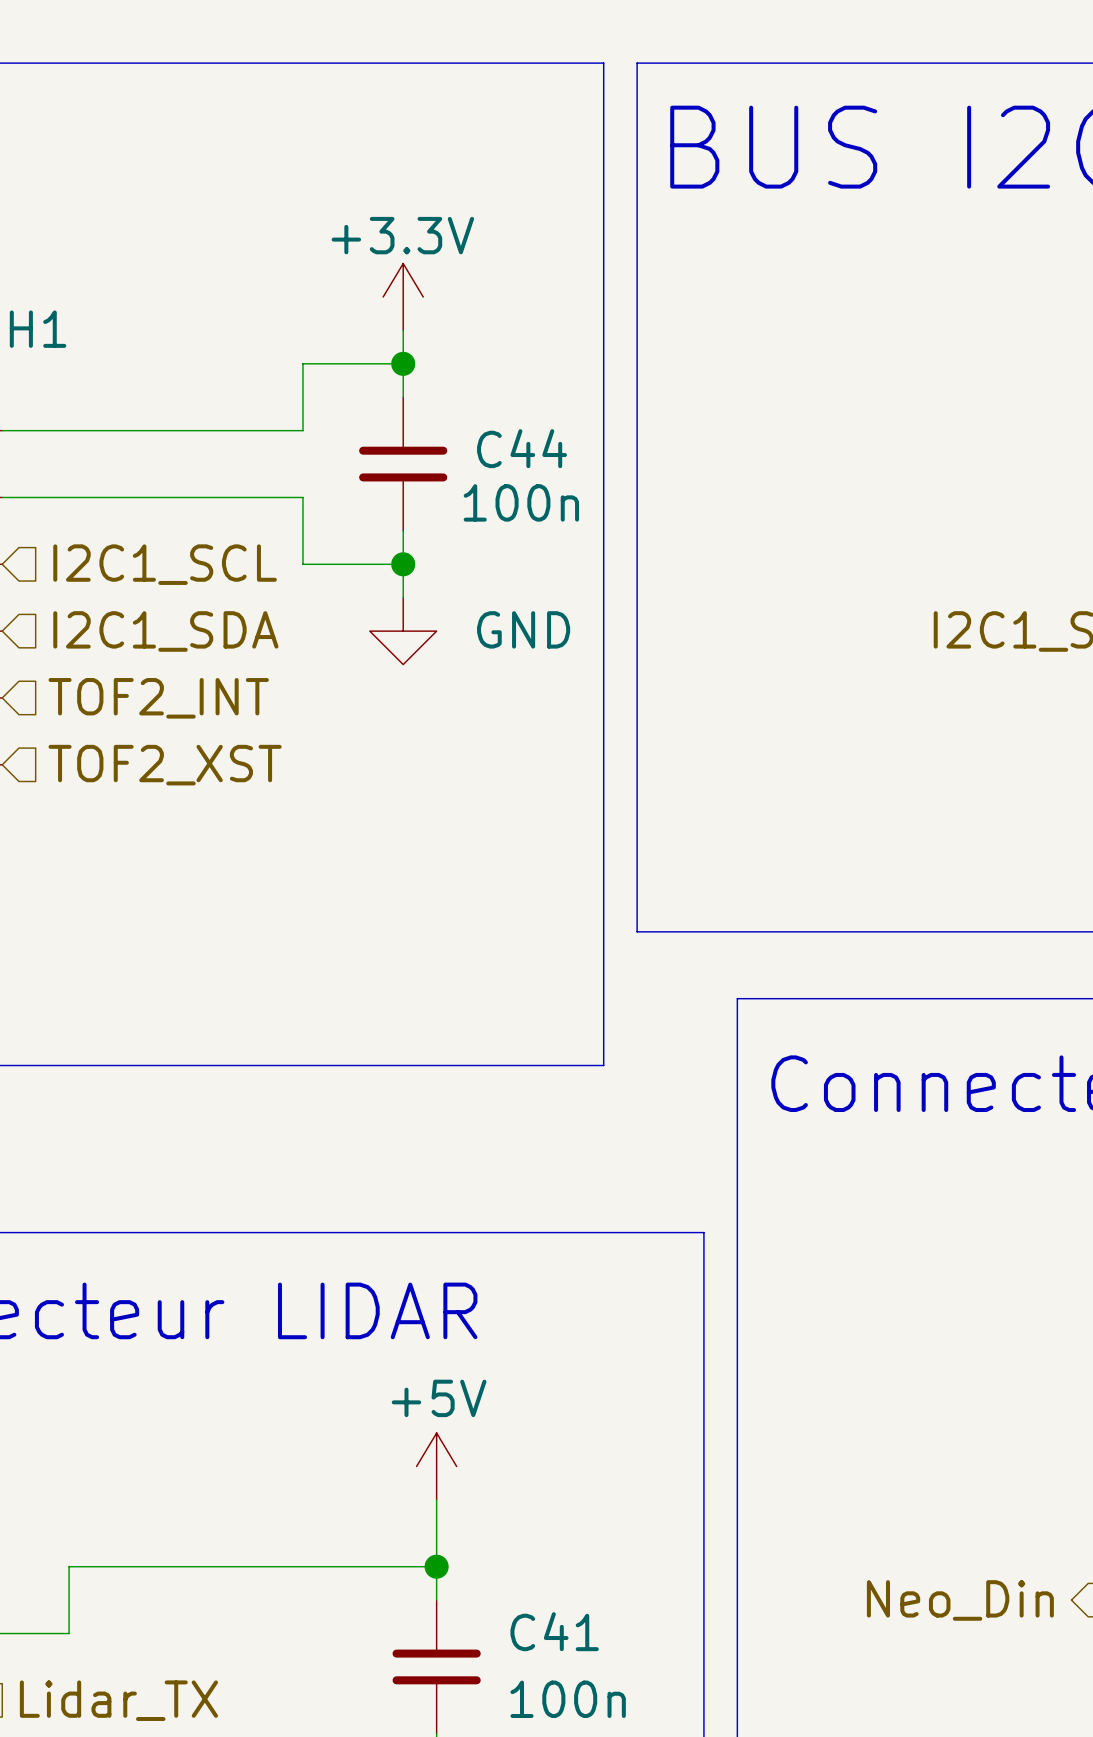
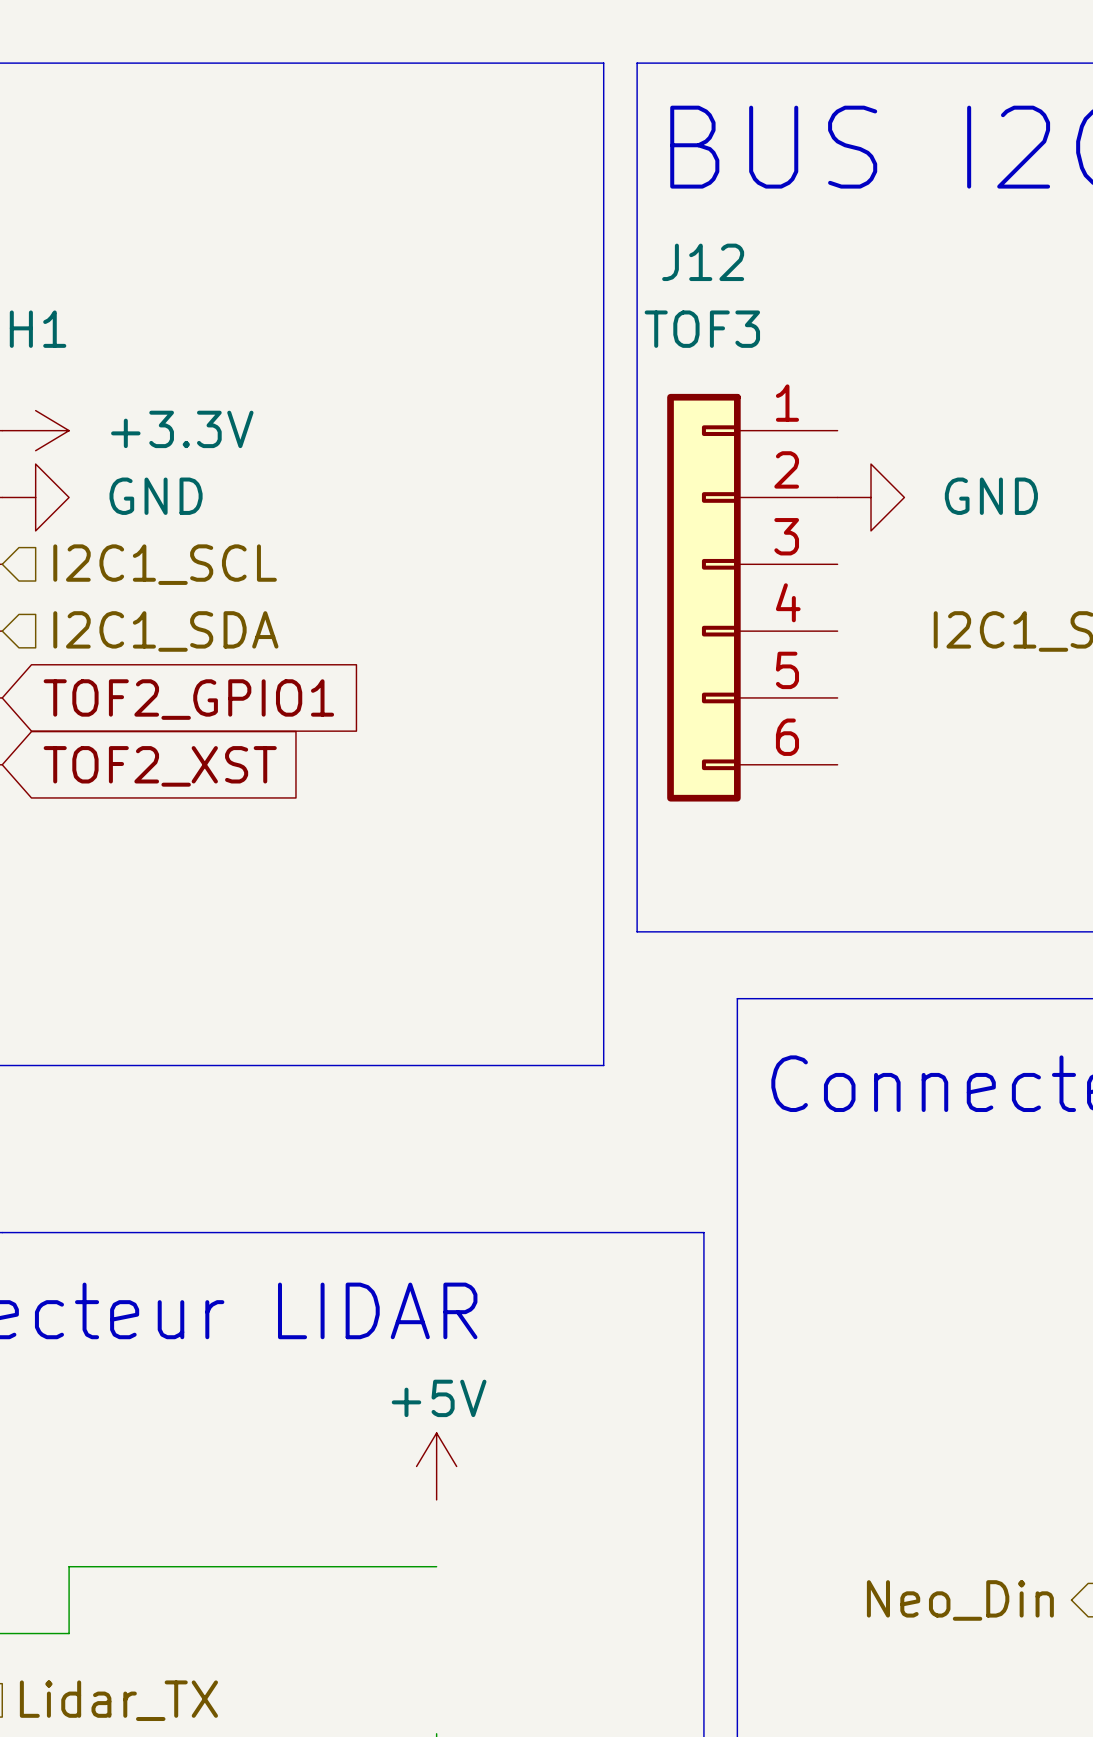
power symbol: +3.3V (403, 297) -> none
wire: (403, 330) (403, 397) -> none
wire: (403, 363) (302, 363) (302, 430) (2, 430) -> none
junction: (403, 363) -> none
power symbol: none -> +3.3V (35, 430)
C44: 100n (403, 464) -> none
wire: (2, 497) (302, 497) (302, 564) (403, 564) -> none
power symbol: none -> GND (35, 497)
power symbol: none -> GND (871, 497)
wire: (403, 530) (403, 597) -> none
junction: (403, 564) -> none
J12: none -> TOF3 (752, 597)
power symbol: GND (403, 631) -> none
hierarchical label: TOF2_INT (158, 698) -> none
global label: none -> TOF2_GPIO1 (188, 699)
hierarchical label: TOF2_XST (165, 765) -> none
global label: none -> TOF2_XST (160, 766)
wire: (436, 1499) (436, 1600) -> none
junction: (436, 1566) -> none
C41: 100n (436, 1666) -> none

